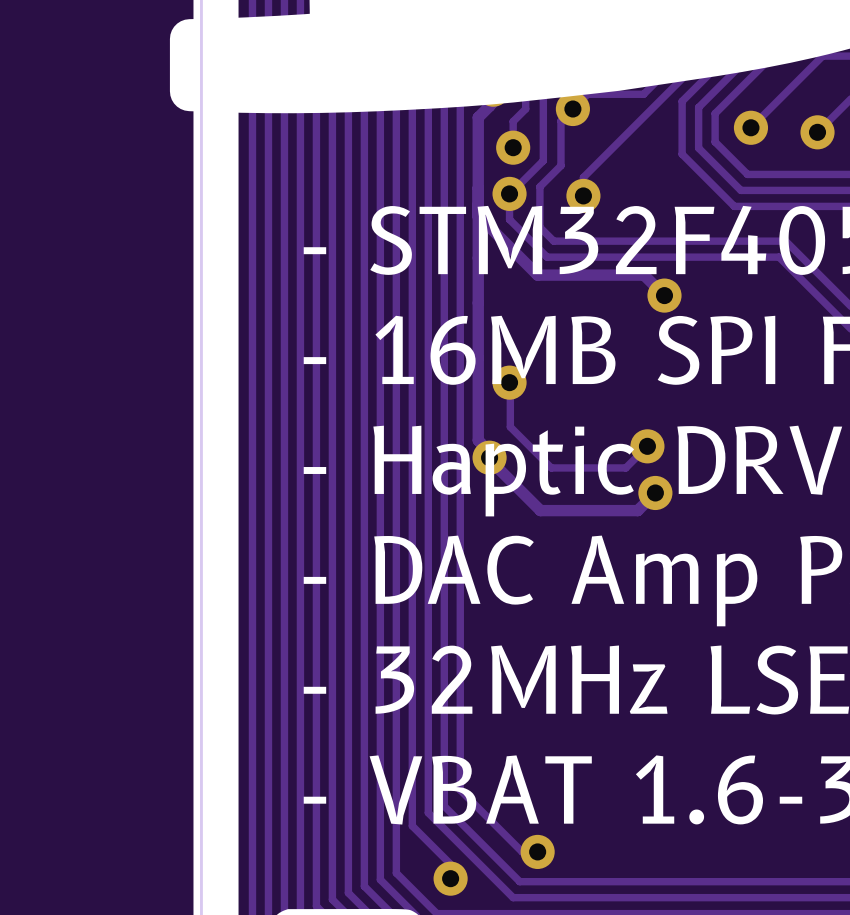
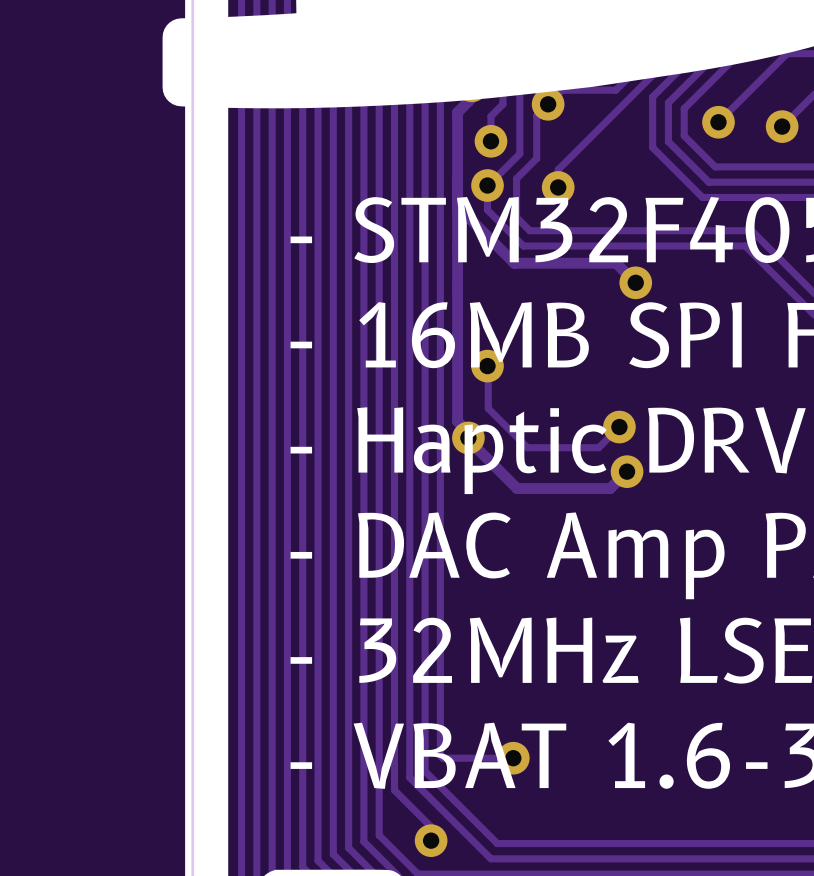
track: (462, 792) (522, 851) (537, 851) -> (442, 758) (513, 758)
via position: (537, 851) -> (513, 758)

